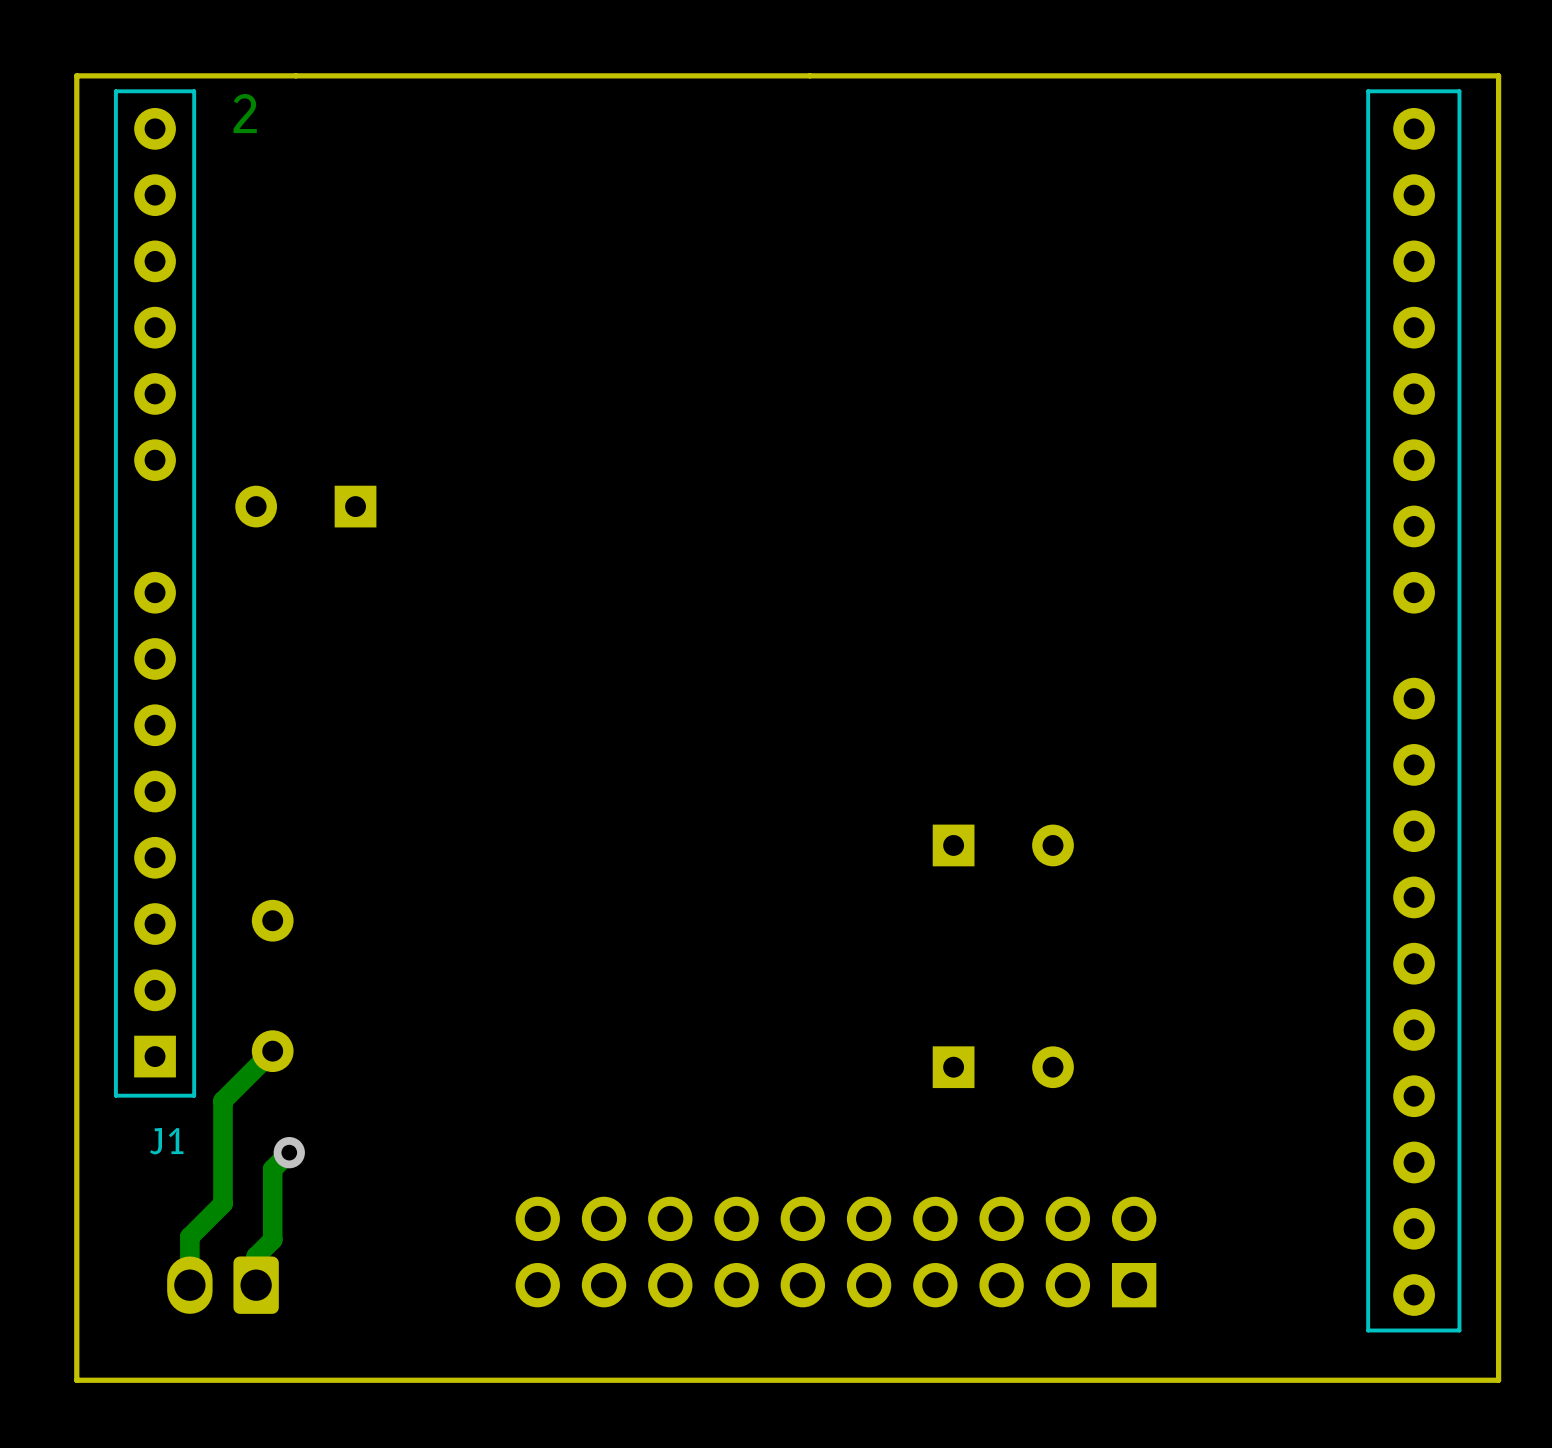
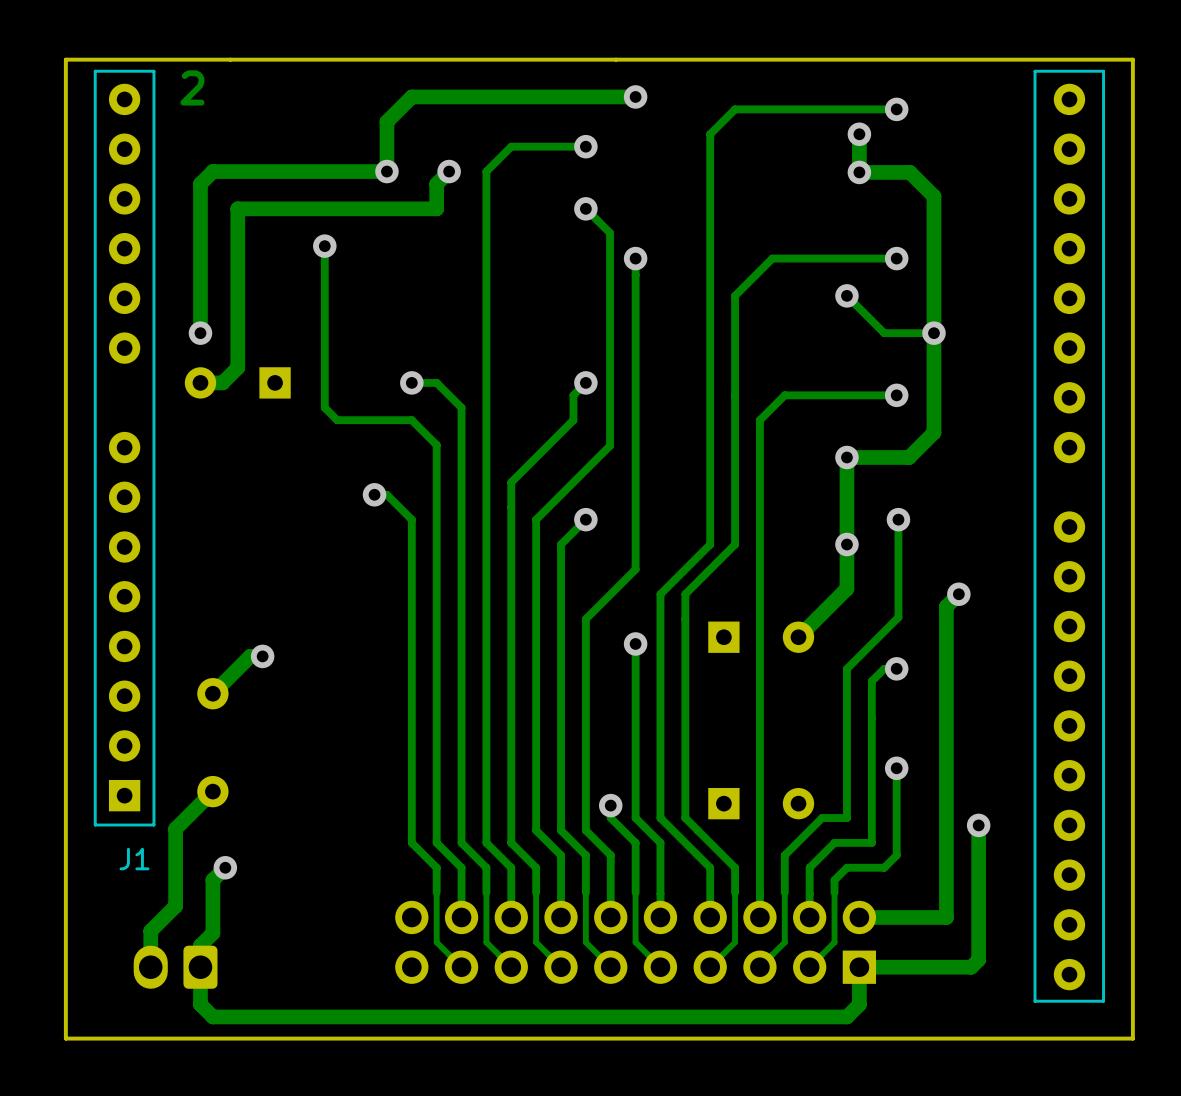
track: none -> (635, 96) (411, 96) (386, 121) (386, 171) (212, 171) (200, 183) (200, 333)
via: none -> (635, 96)
track: none -> (896, 109) (735, 109) (710, 134) (710, 544) (660, 594) (660, 818) (710, 867) (710, 917)
via: none -> (896, 109)
track: none -> (859, 134) (859, 172) (910, 172) (933, 196) (933, 432) (909, 457) (846, 457) (846, 588) (798, 637)
via: none -> (859, 134)
track: none -> (585, 146) (511, 146) (486, 171) (486, 842) (511, 867) (511, 917)
via: none -> (585, 146)
via: none -> (386, 171)
track: none -> (449, 171) (436, 183) (436, 208) (237, 208) (237, 367) (222, 382) (200, 382)
via: none -> (449, 171)
via: none -> (859, 172)
track: none -> (585, 208) (610, 233) (610, 445) (536, 519) (536, 830) (561, 855) (561, 917)
via: none -> (585, 208)
track: none -> (324, 246) (324, 407) (337, 420) (411, 420) (436, 445) (436, 842) (461, 867) (461, 917)
via: none -> (324, 246)
track: none -> (635, 258) (635, 569) (585, 619) (585, 830) (610, 855) (610, 917)
via: none -> (635, 258)
track: none -> (896, 258) (772, 258) (735, 295) (735, 544) (685, 594) (685, 818) (735, 867) (735, 942) (710, 967)
via: none -> (896, 258)
track: none -> (846, 295) (884, 333) (933, 333)
via: none -> (846, 295)
via: none -> (200, 333)
via: none -> (933, 333)
track: none -> (411, 382) (436, 382) (461, 407) (461, 842) (486, 867) (486, 942) (511, 967)
via: none -> (411, 382)
track: none -> (585, 382) (573, 395) (573, 420) (511, 482) (511, 842) (536, 867) (536, 942) (561, 967)
via: none -> (585, 382)
track: none -> (896, 395) (784, 395) (759, 420) (759, 917)
via: none -> (896, 395)
via: none -> (846, 457)
track: none -> (374, 494) (386, 494) (411, 519) (411, 842) (436, 867) (436, 942) (461, 967)
via: none -> (374, 494)
track: none -> (585, 519) (561, 544) (561, 830) (585, 855) (585, 942) (610, 967)
via: none -> (585, 519)
track: none -> (898, 519) (898, 617) (846, 668) (846, 818) (822, 818) (784, 855) (784, 942) (759, 967)
via: none -> (898, 519)
via: none -> (846, 544)
track: none -> (958, 594) (946, 606) (946, 917) (859, 917)
via: none -> (958, 594)
track: none -> (635, 643) (635, 818) (660, 842) (660, 917)
via: none -> (635, 643)
track: none -> (262, 656) (250, 656) (212, 693)
via: none -> (262, 656)
track: none -> (896, 668) (884, 668) (871, 681) (871, 842) (834, 842) (809, 867) (809, 917)
via: none -> (896, 668)
track: none -> (896, 768) (896, 855) (884, 867) (846, 867) (834, 880) (834, 942) (809, 967)
via: none -> (896, 768)
track: none -> (610, 805) (610, 818) (635, 842) (635, 942) (660, 967)
via: none -> (610, 805)
track: none -> (978, 825) (978, 959) (971, 967) (859, 967) (859, 1004) (846, 1016) (212, 1016) (200, 1004) (200, 967)
via: none -> (978, 825)

